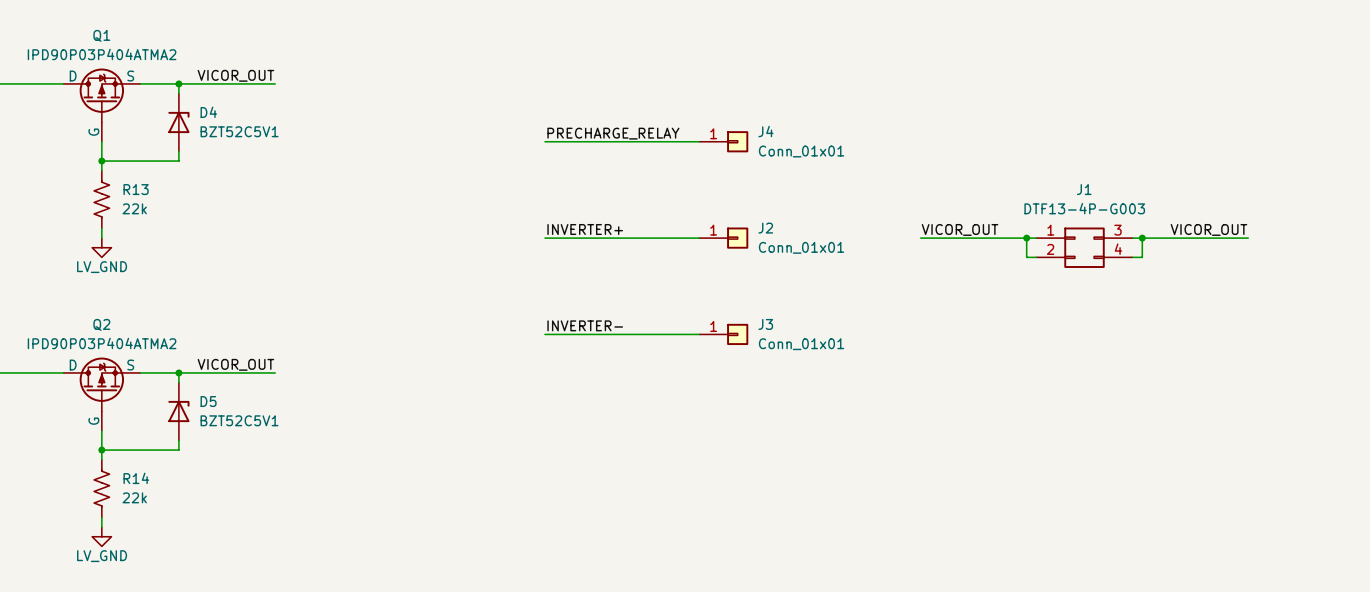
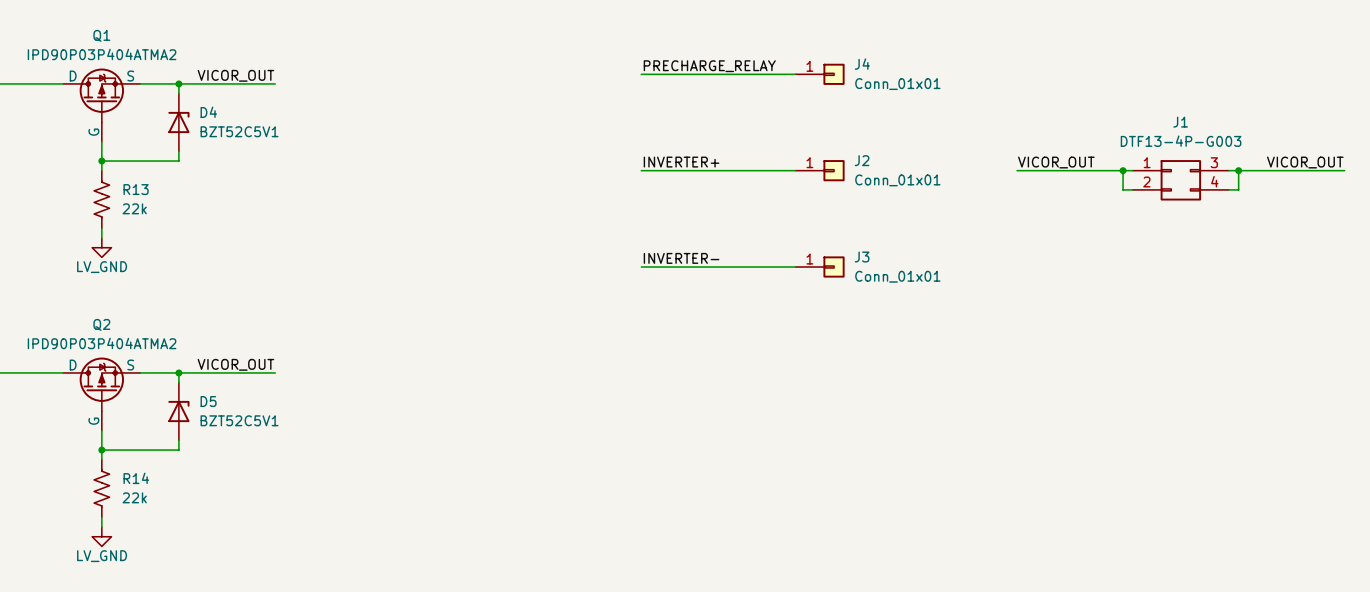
label position: PRECHARGE_RELAY (613, 133) -> PRECHARGE_RELAY (709, 66)
wire: (545, 141) (699, 141) -> (641, 74) (795, 74)
J4 position: (723, 141) -> (820, 74)
junction: none -> (1123, 170)
junction: none -> (1238, 170)
label position: INVERTER+ (585, 229) -> INVERTER+ (681, 162)
label position: VICOR_OUT (960, 229) -> VICOR_OUT (1056, 162)
label position: VICOR_OUT (1208, 229) -> VICOR_OUT (1305, 162)
wire: (545, 238) (699, 238) -> (641, 170) (795, 170)
J2 position: (723, 238) -> (820, 170)
wire: (920, 238) (1036, 238) -> (1017, 170) (1132, 170)
wire: (1026, 238) (1026, 257) (1036, 257) -> (1123, 170) (1123, 189) (1132, 189)
junction: (1026, 238) -> none
wire: (1132, 238) (1248, 238) -> (1229, 170) (1344, 170)
wire: (1142, 238) (1142, 257) (1132, 257) -> (1238, 170) (1238, 189) (1229, 189)
junction: (1142, 238) -> none
J1 position: (1084, 247) -> (1180, 180)
label position: INVERTER- (585, 325) -> INVERTER- (681, 258)
wire: (545, 334) (699, 334) -> (641, 267) (795, 267)
J3 position: (723, 334) -> (820, 267)

